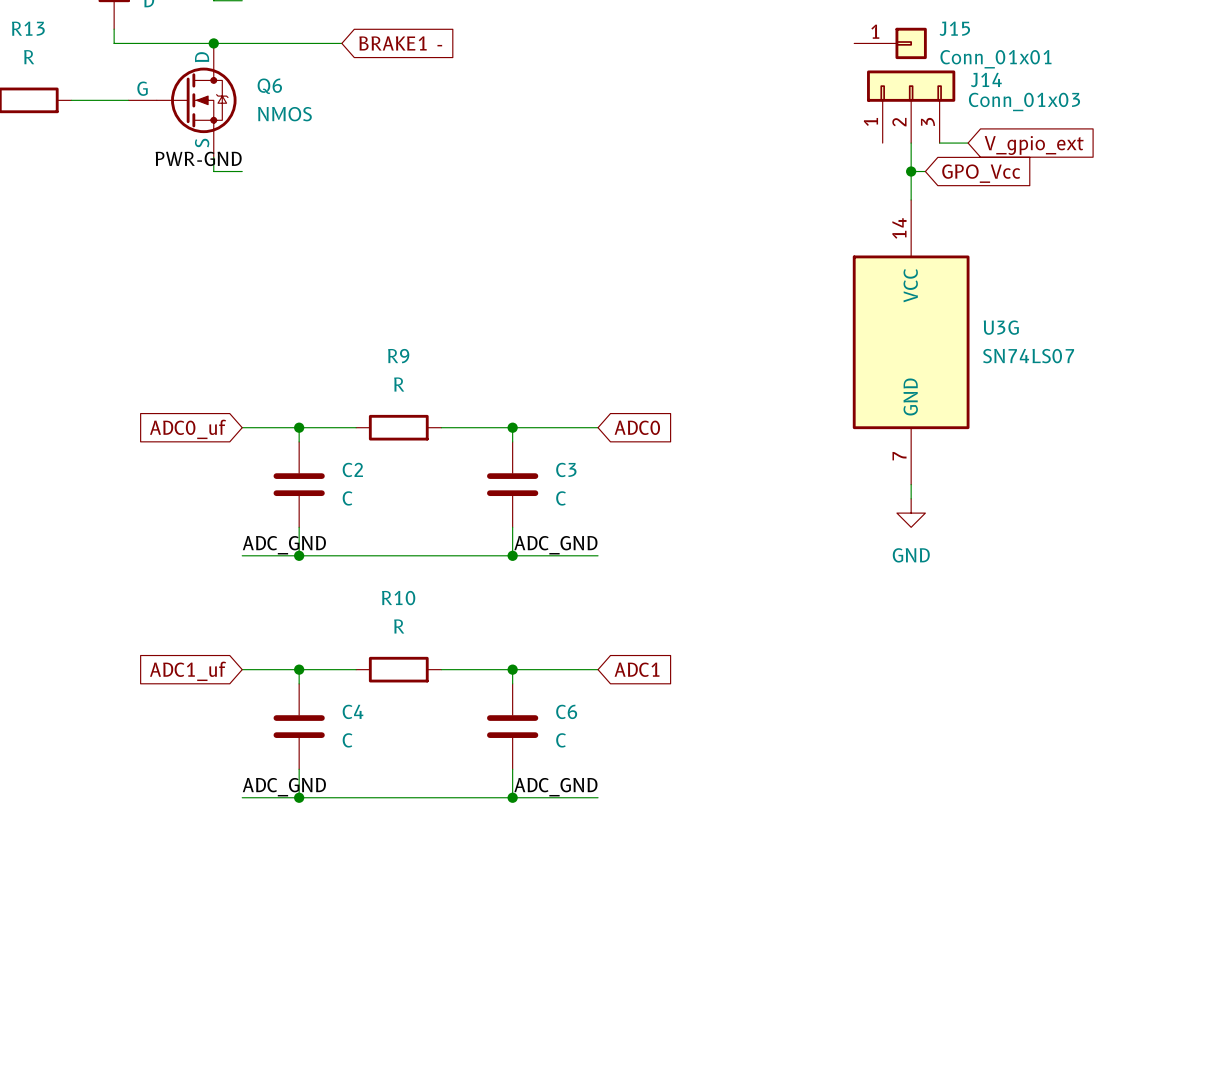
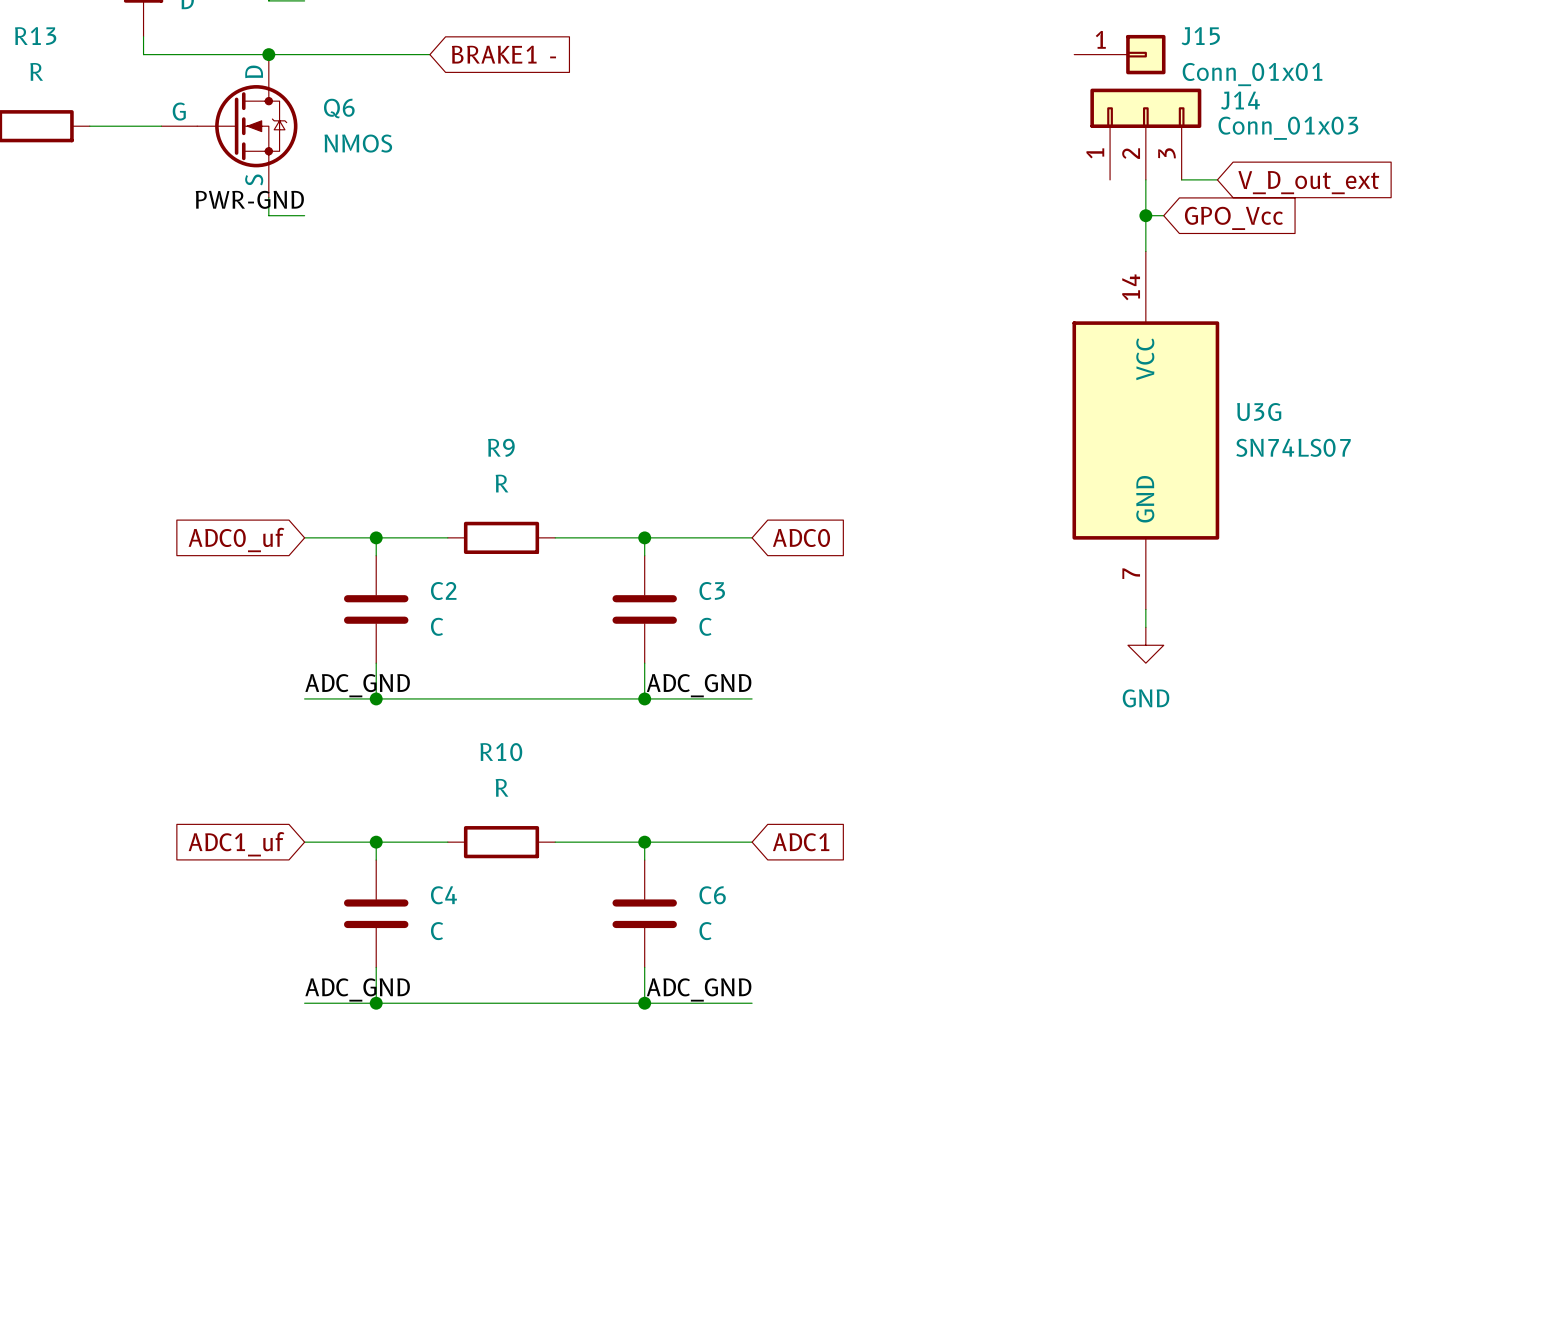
global label: V_gpio_ext (1034, 145) -> V_D_out_ext (1308, 182)

